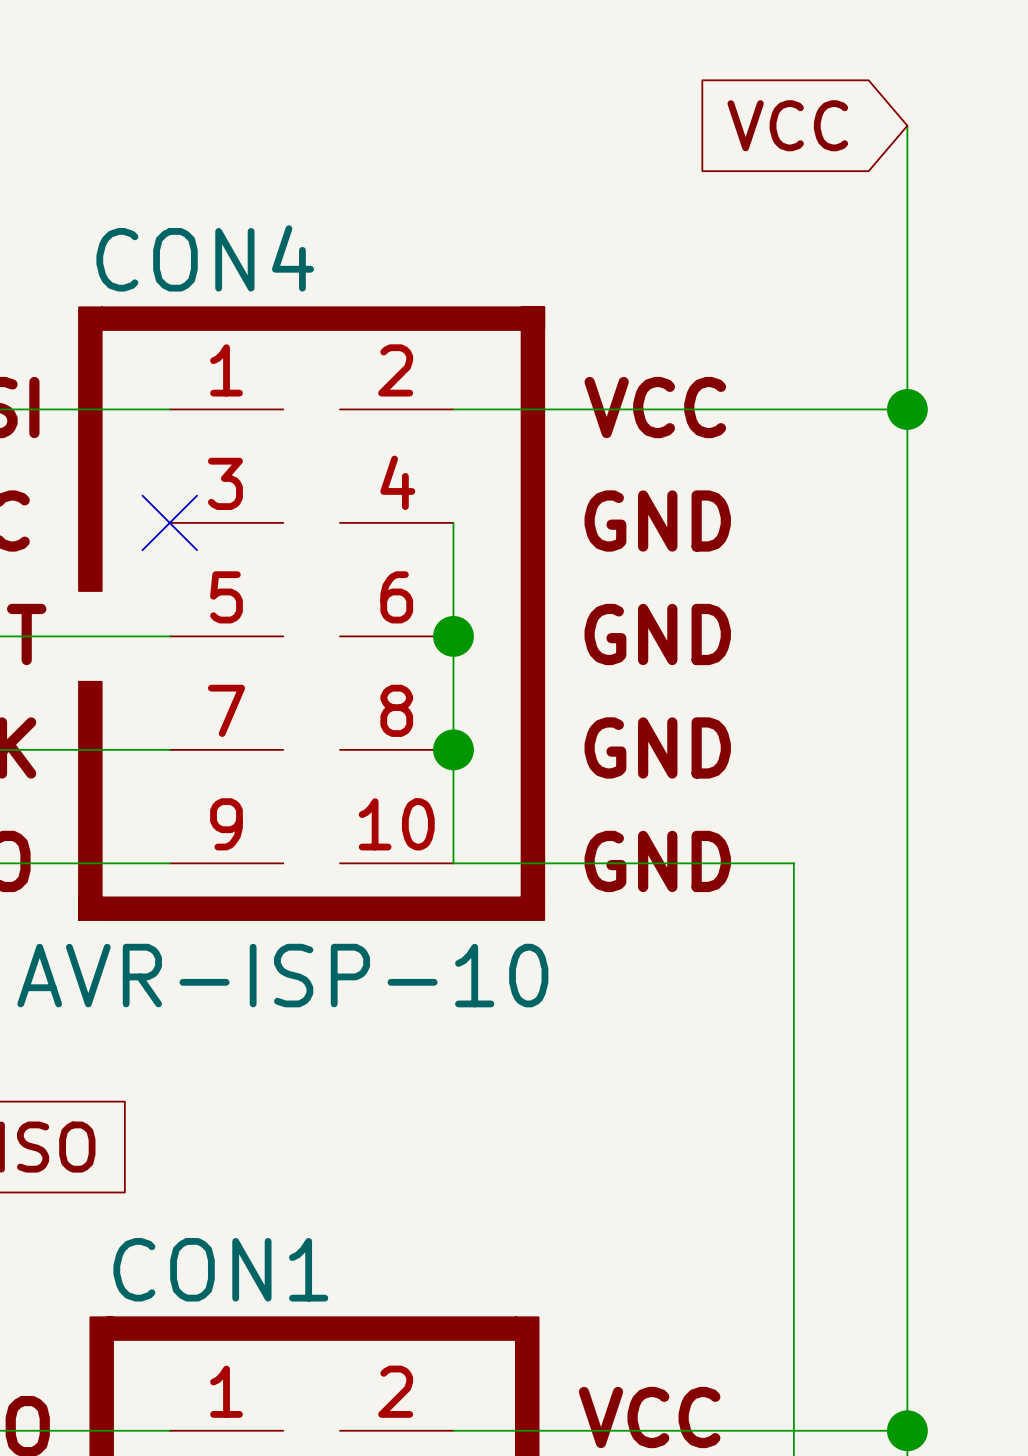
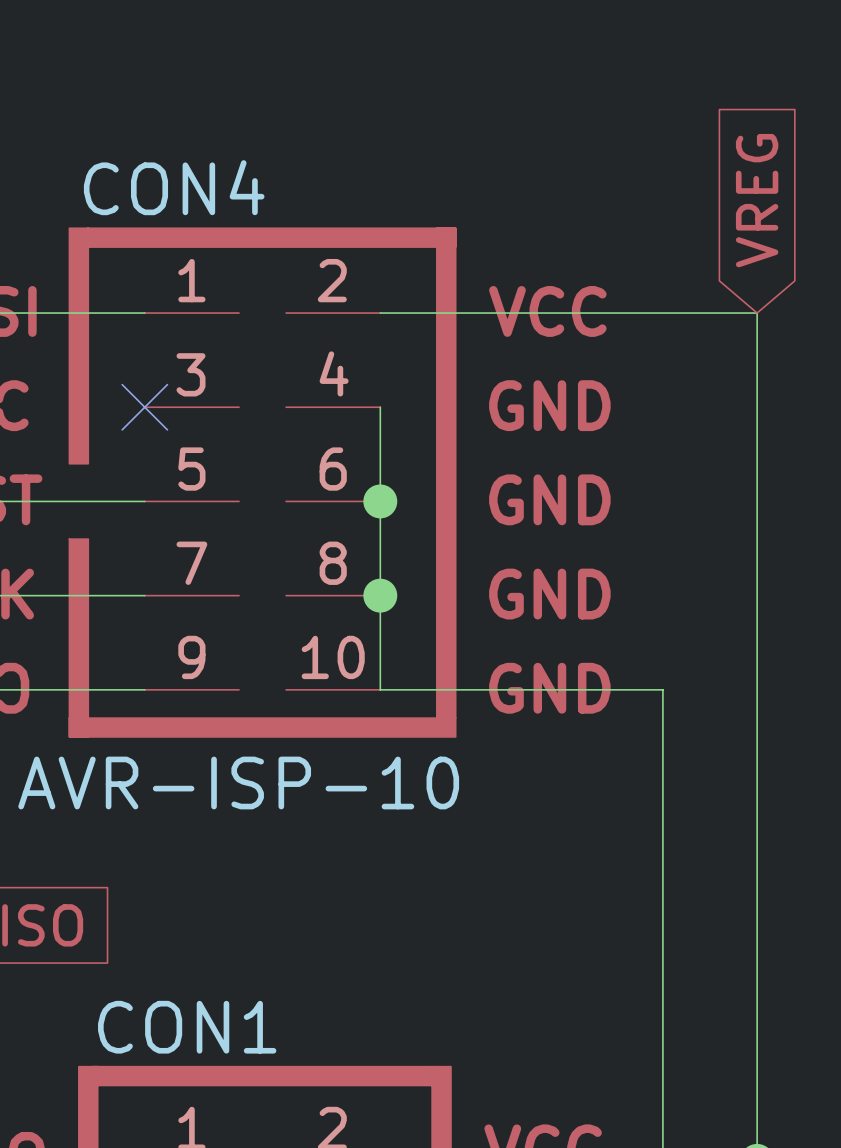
global label: VCC (787, 125) -> none
wire: (907, 125) (907, 409) -> none
global label: none -> VREG (757, 200)
junction: (907, 409) -> none

